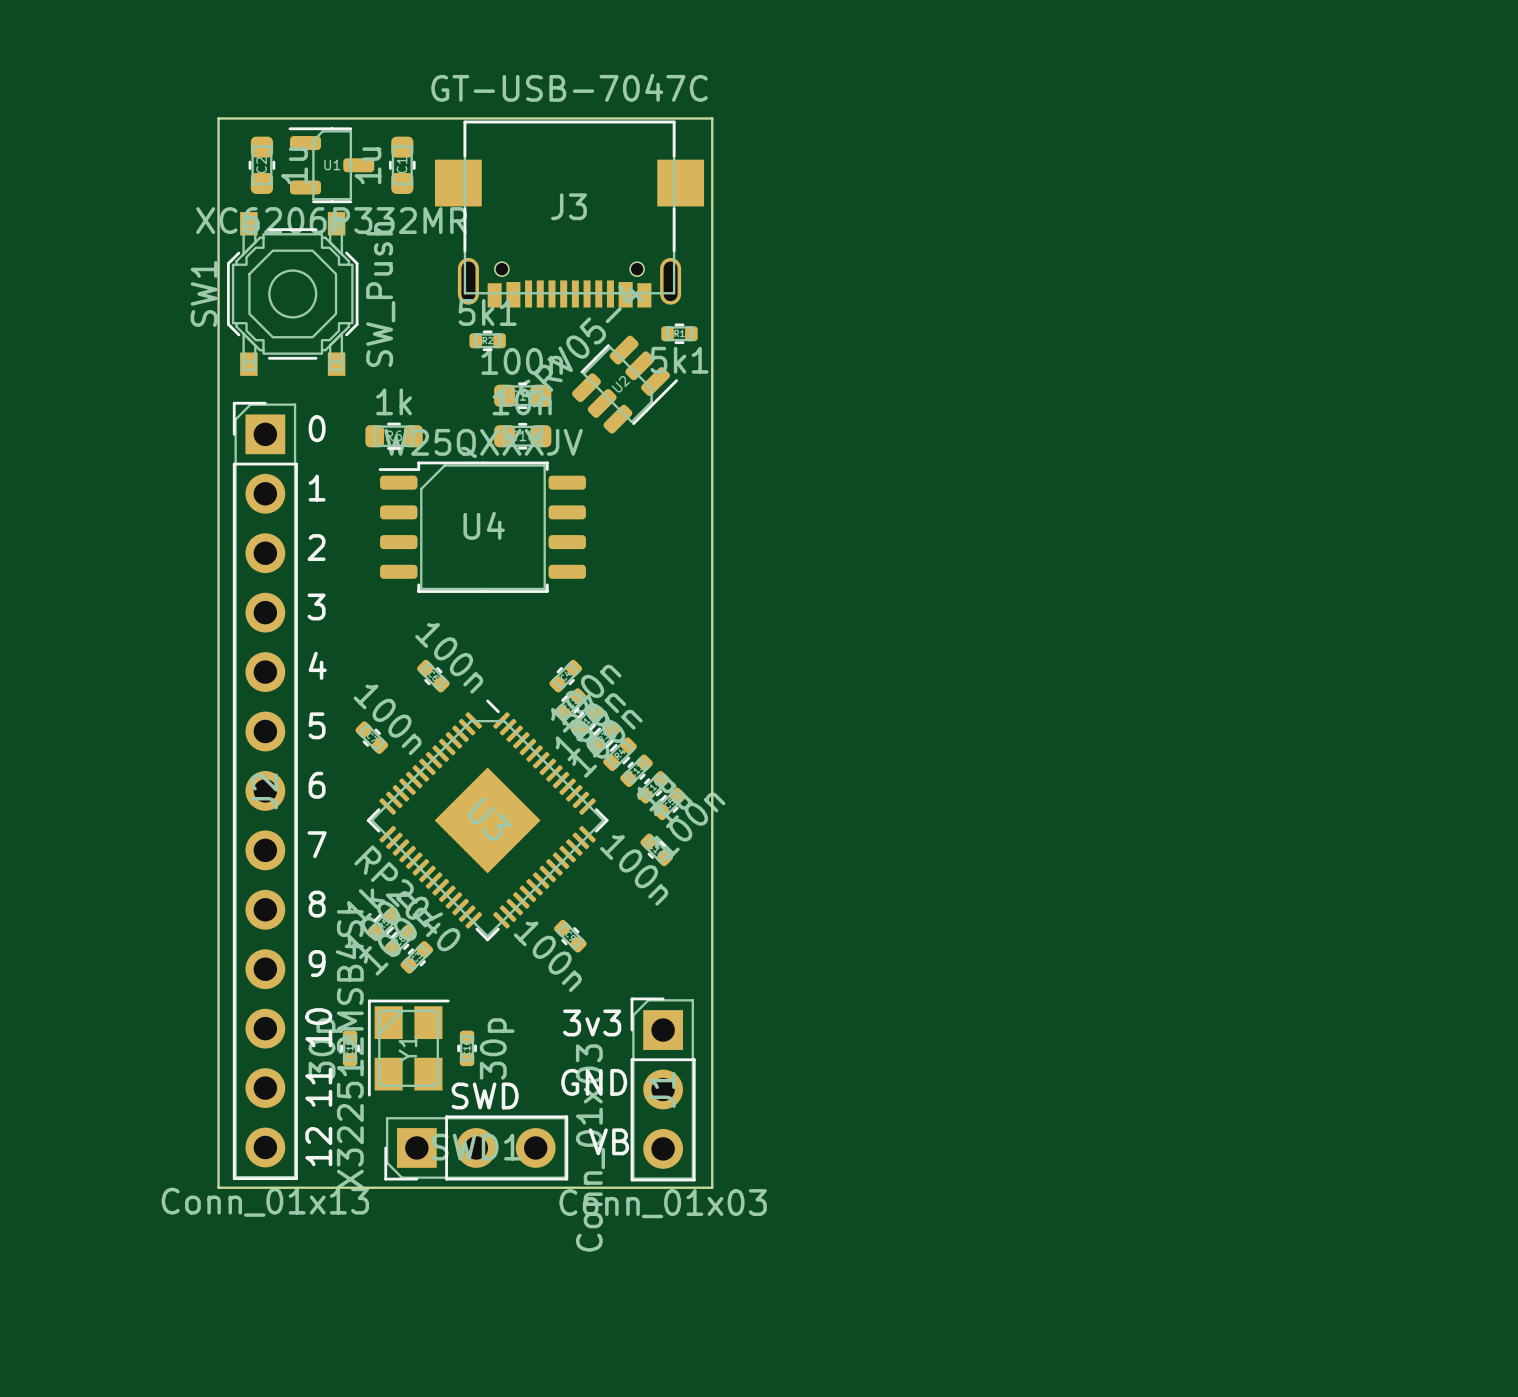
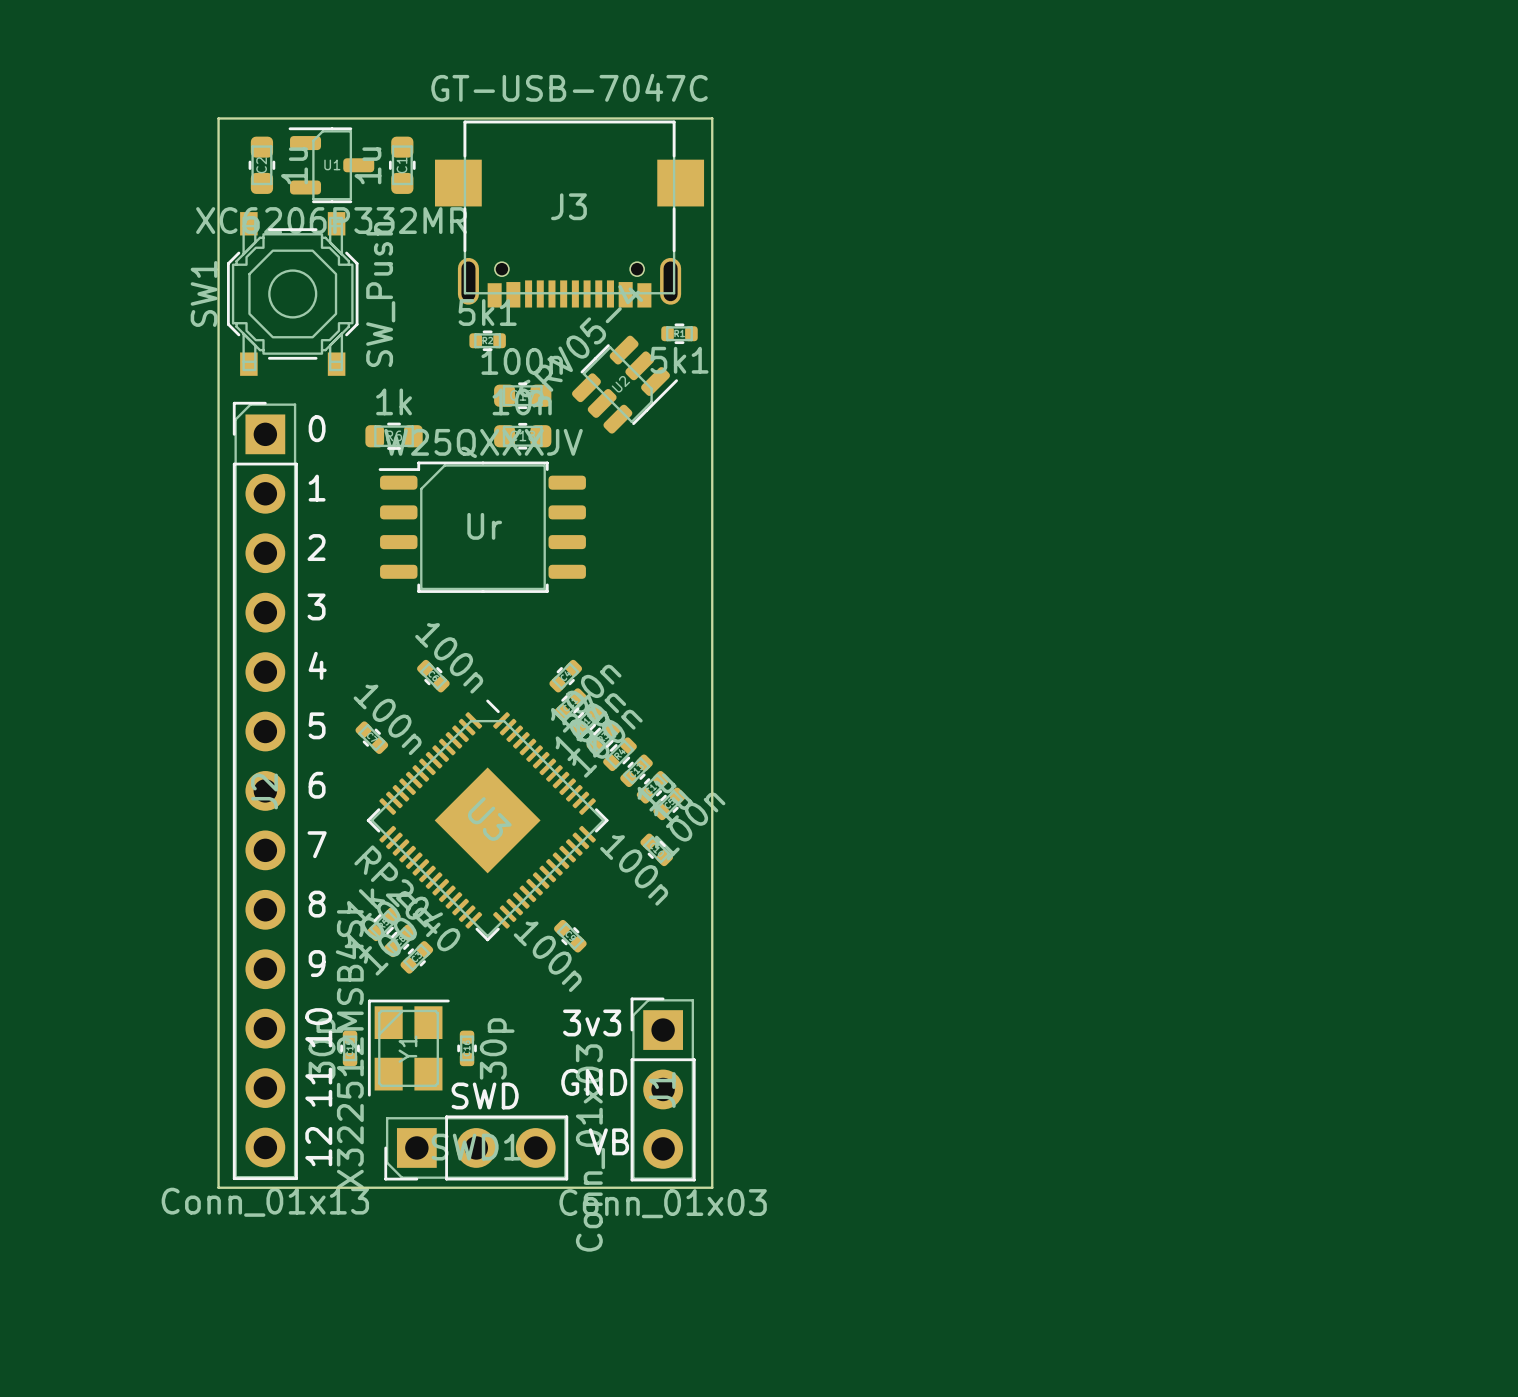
U4 name: U4 (484, 525) -> Ur (484, 526)

